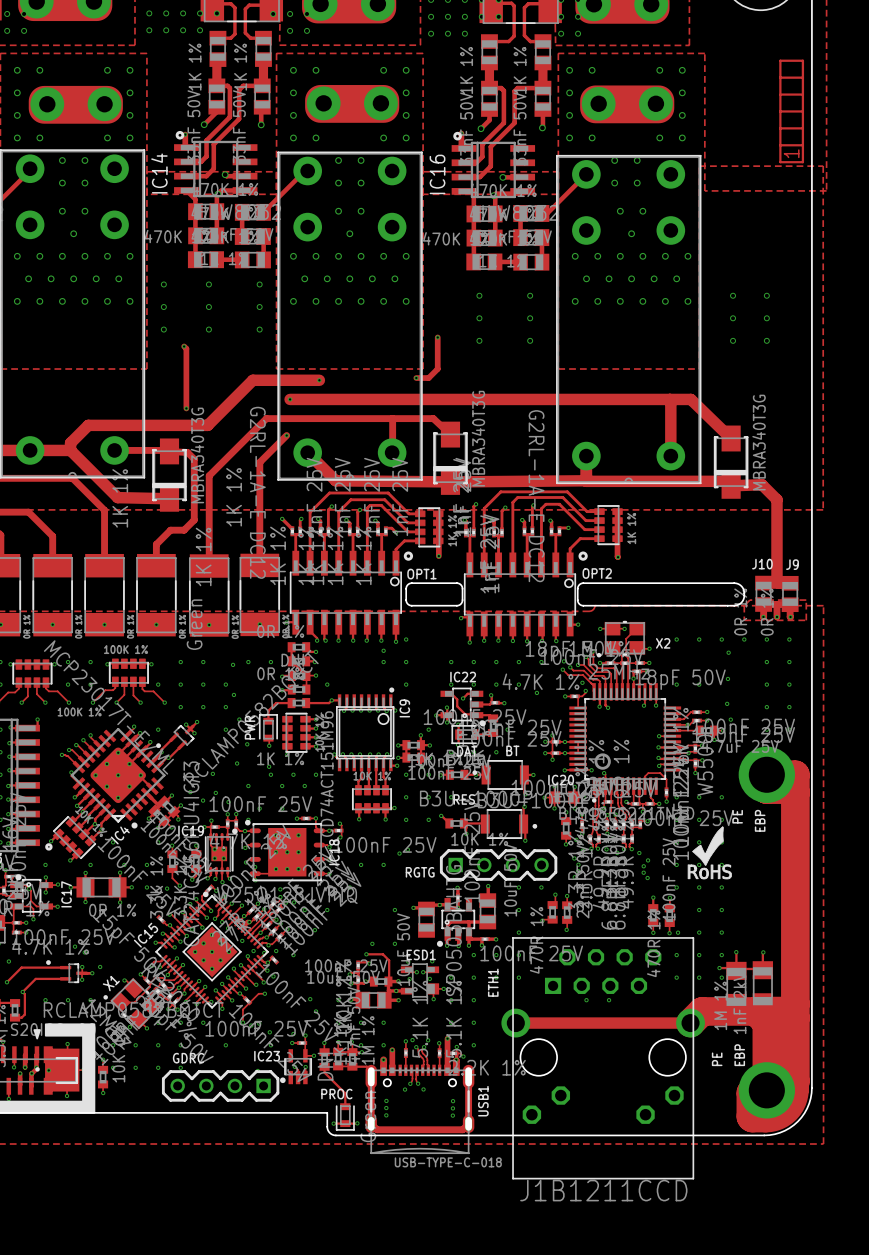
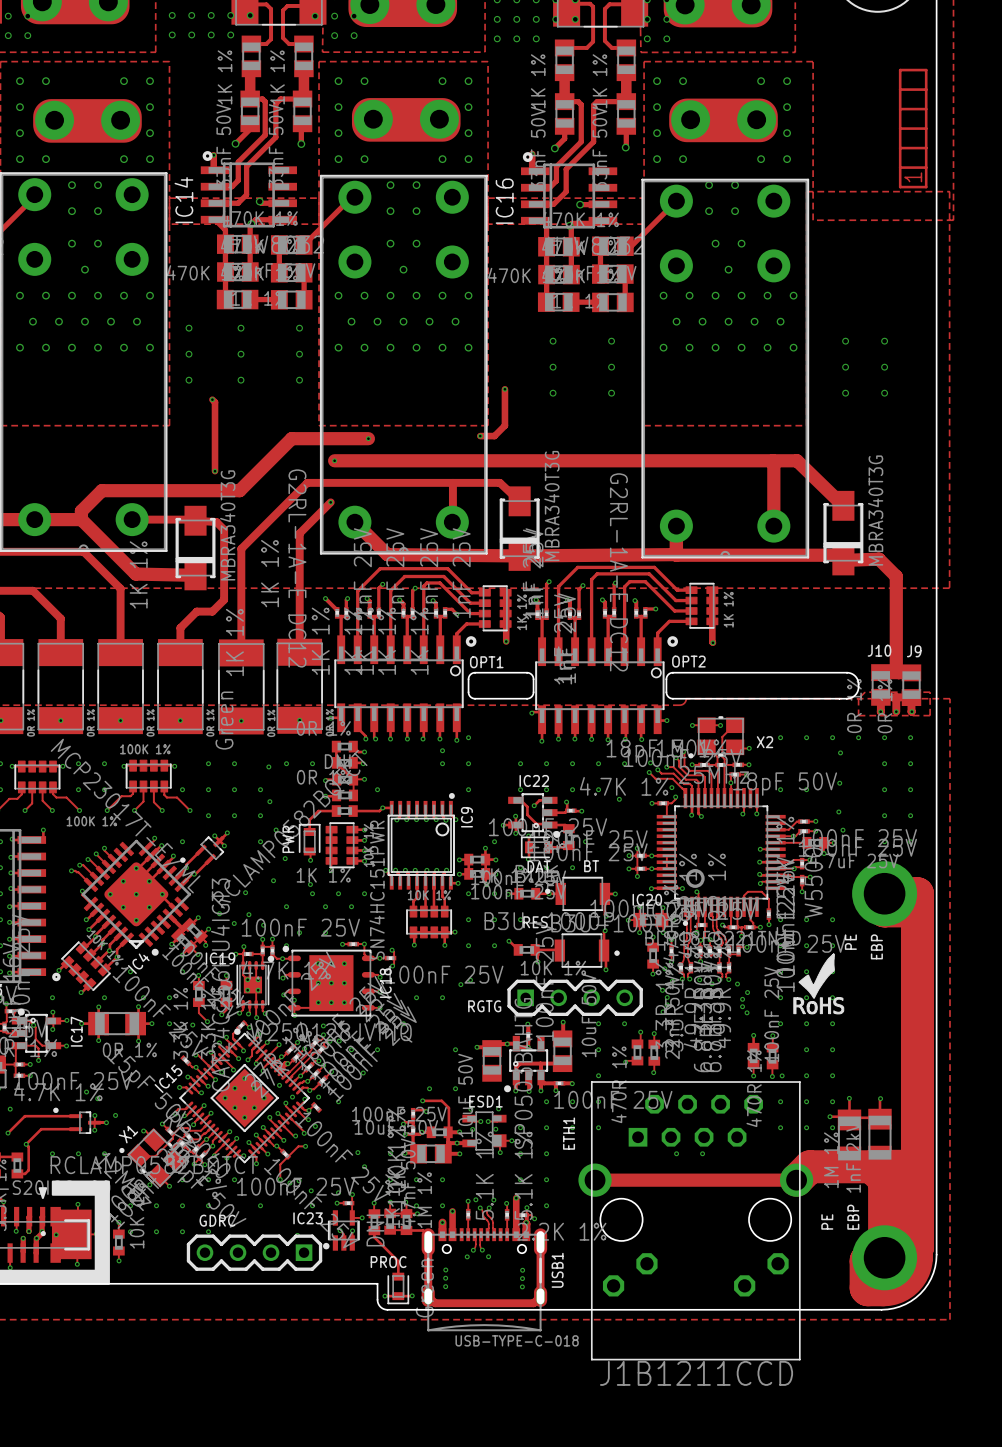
IC9 value: CD74ACT151M96 (326, 774) -> SN74HC151PWR (377, 890)

